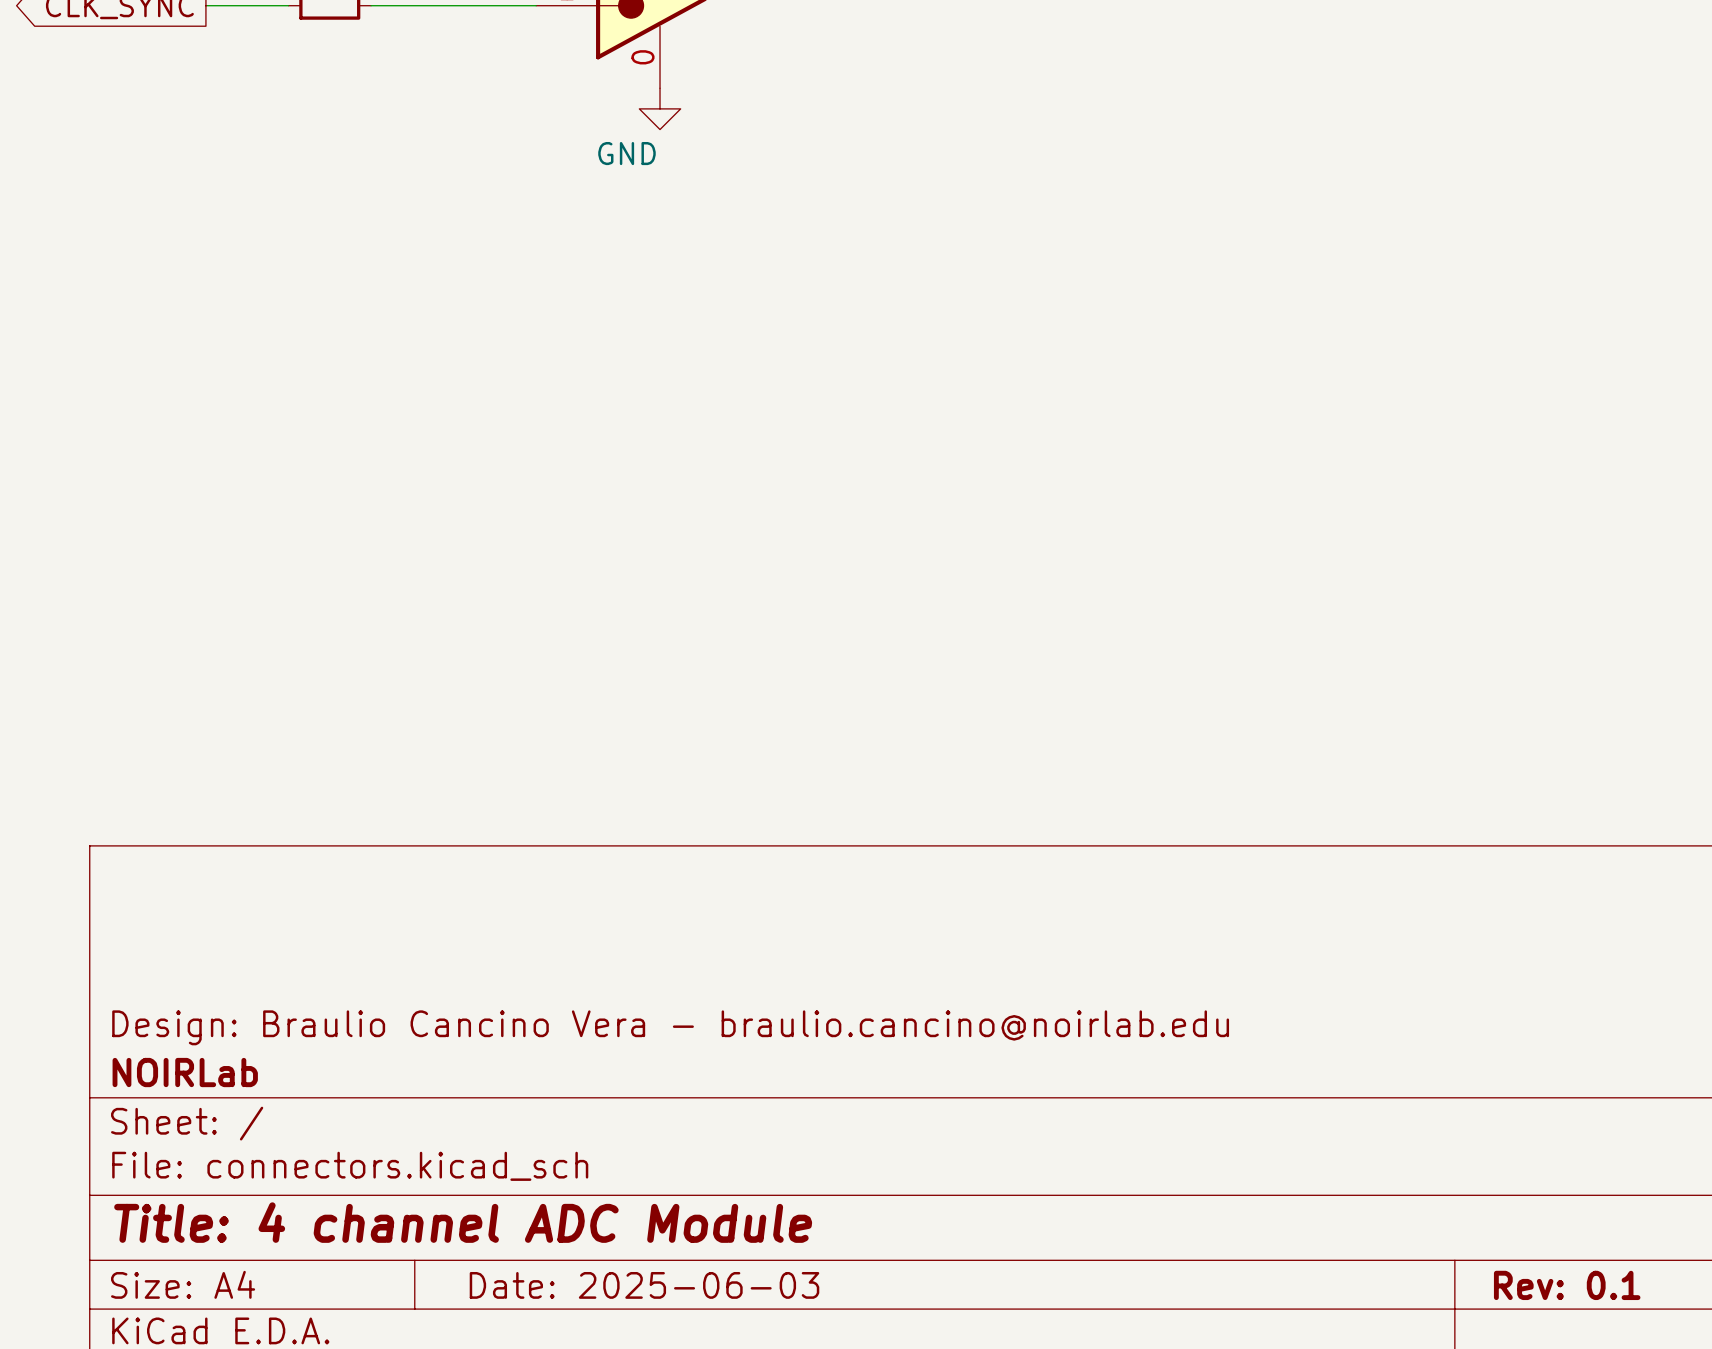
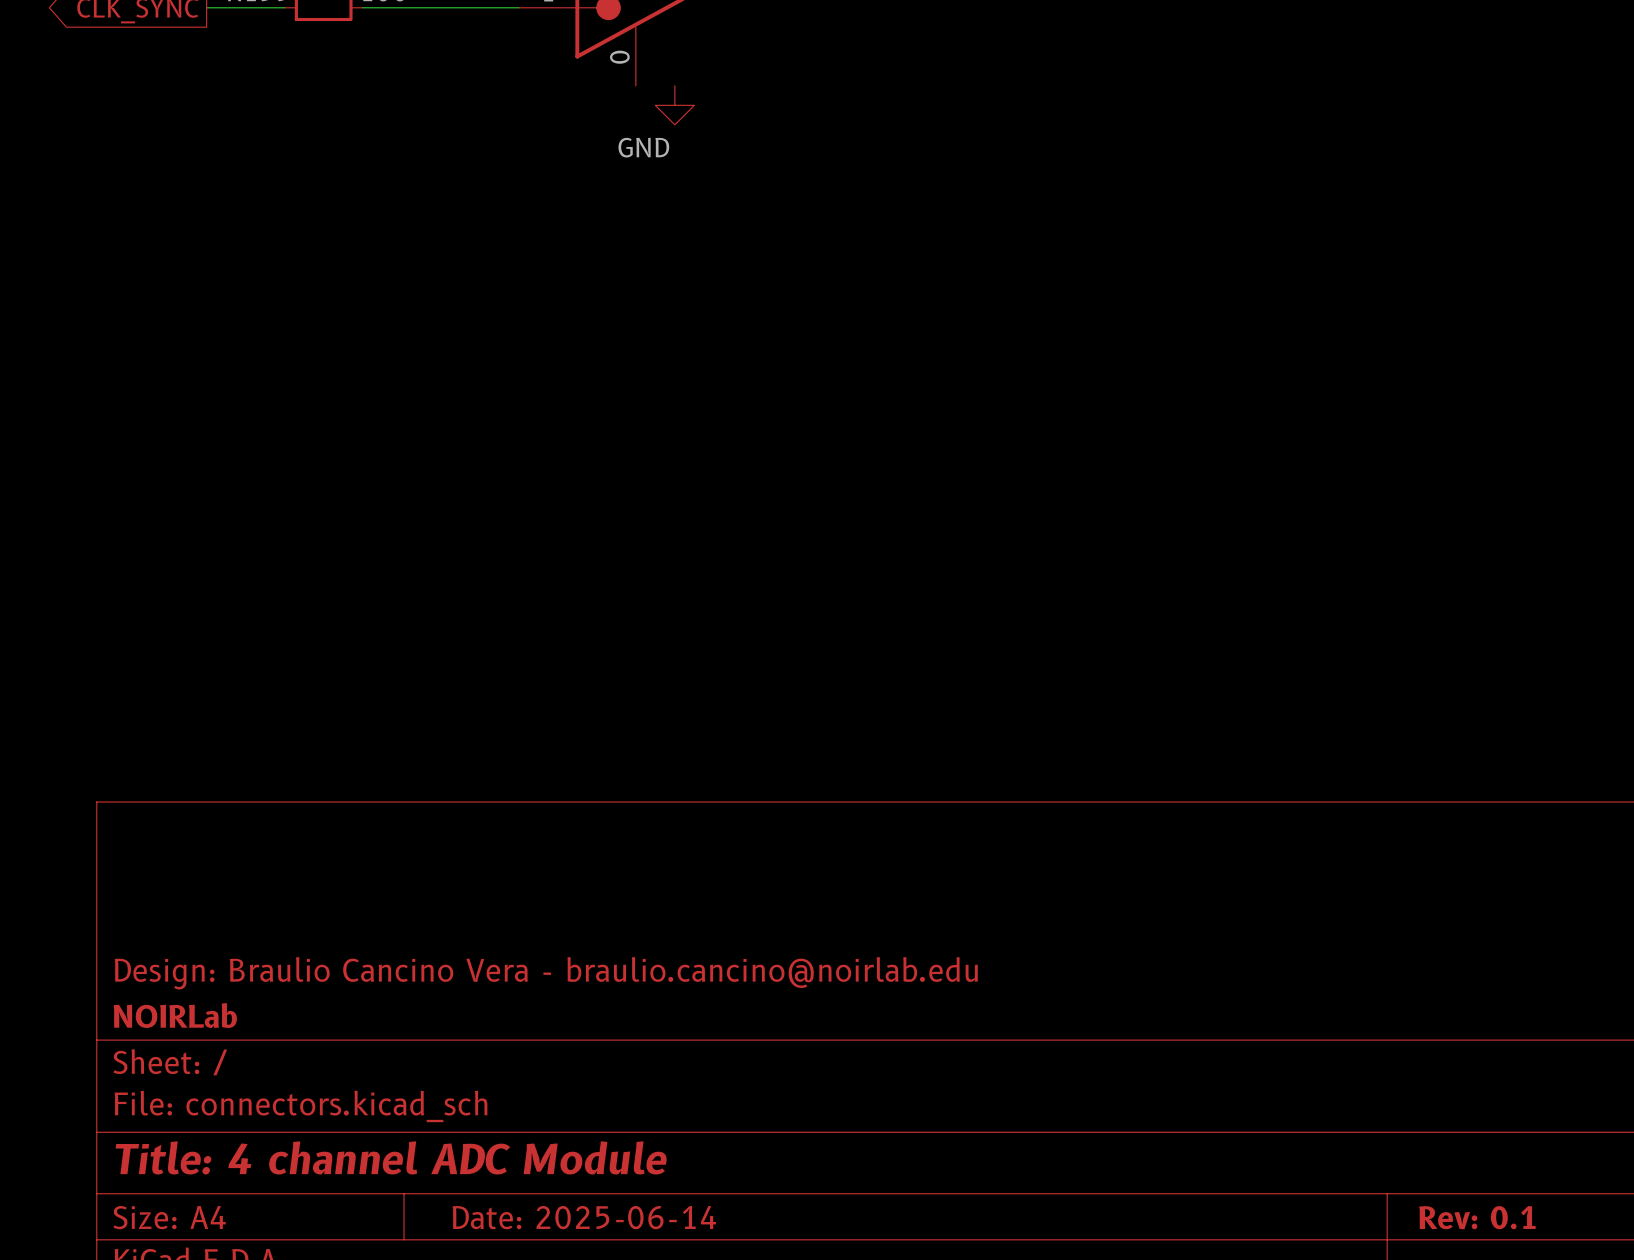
power symbol position: GND (660, 108) -> GND (674, 105)
title block: Date: 2025-06-03 (644, 1285) -> Date: 2025-06-14 (584, 1217)

